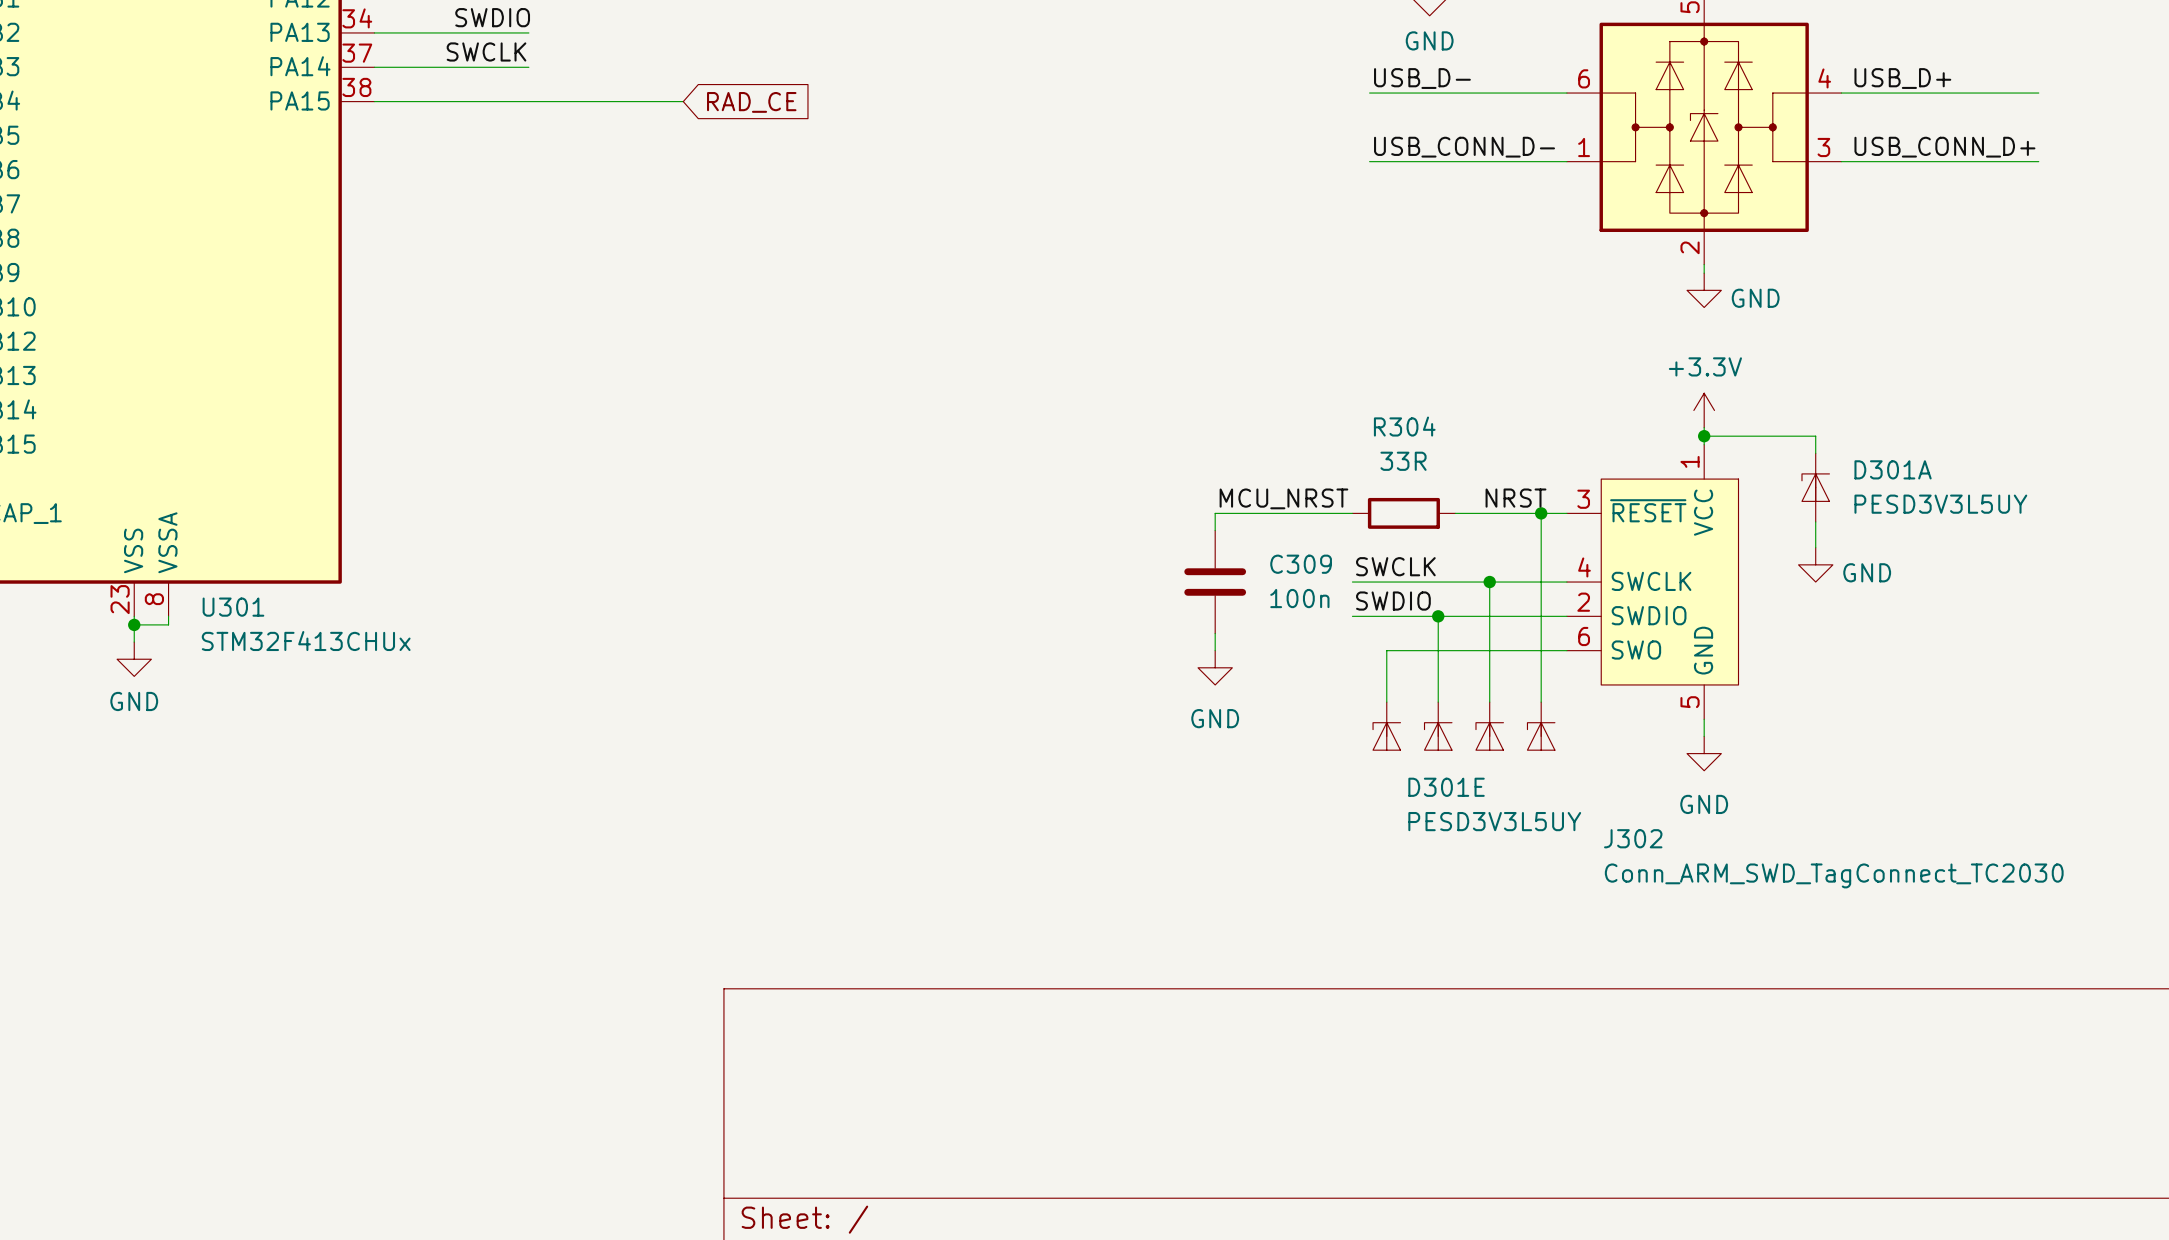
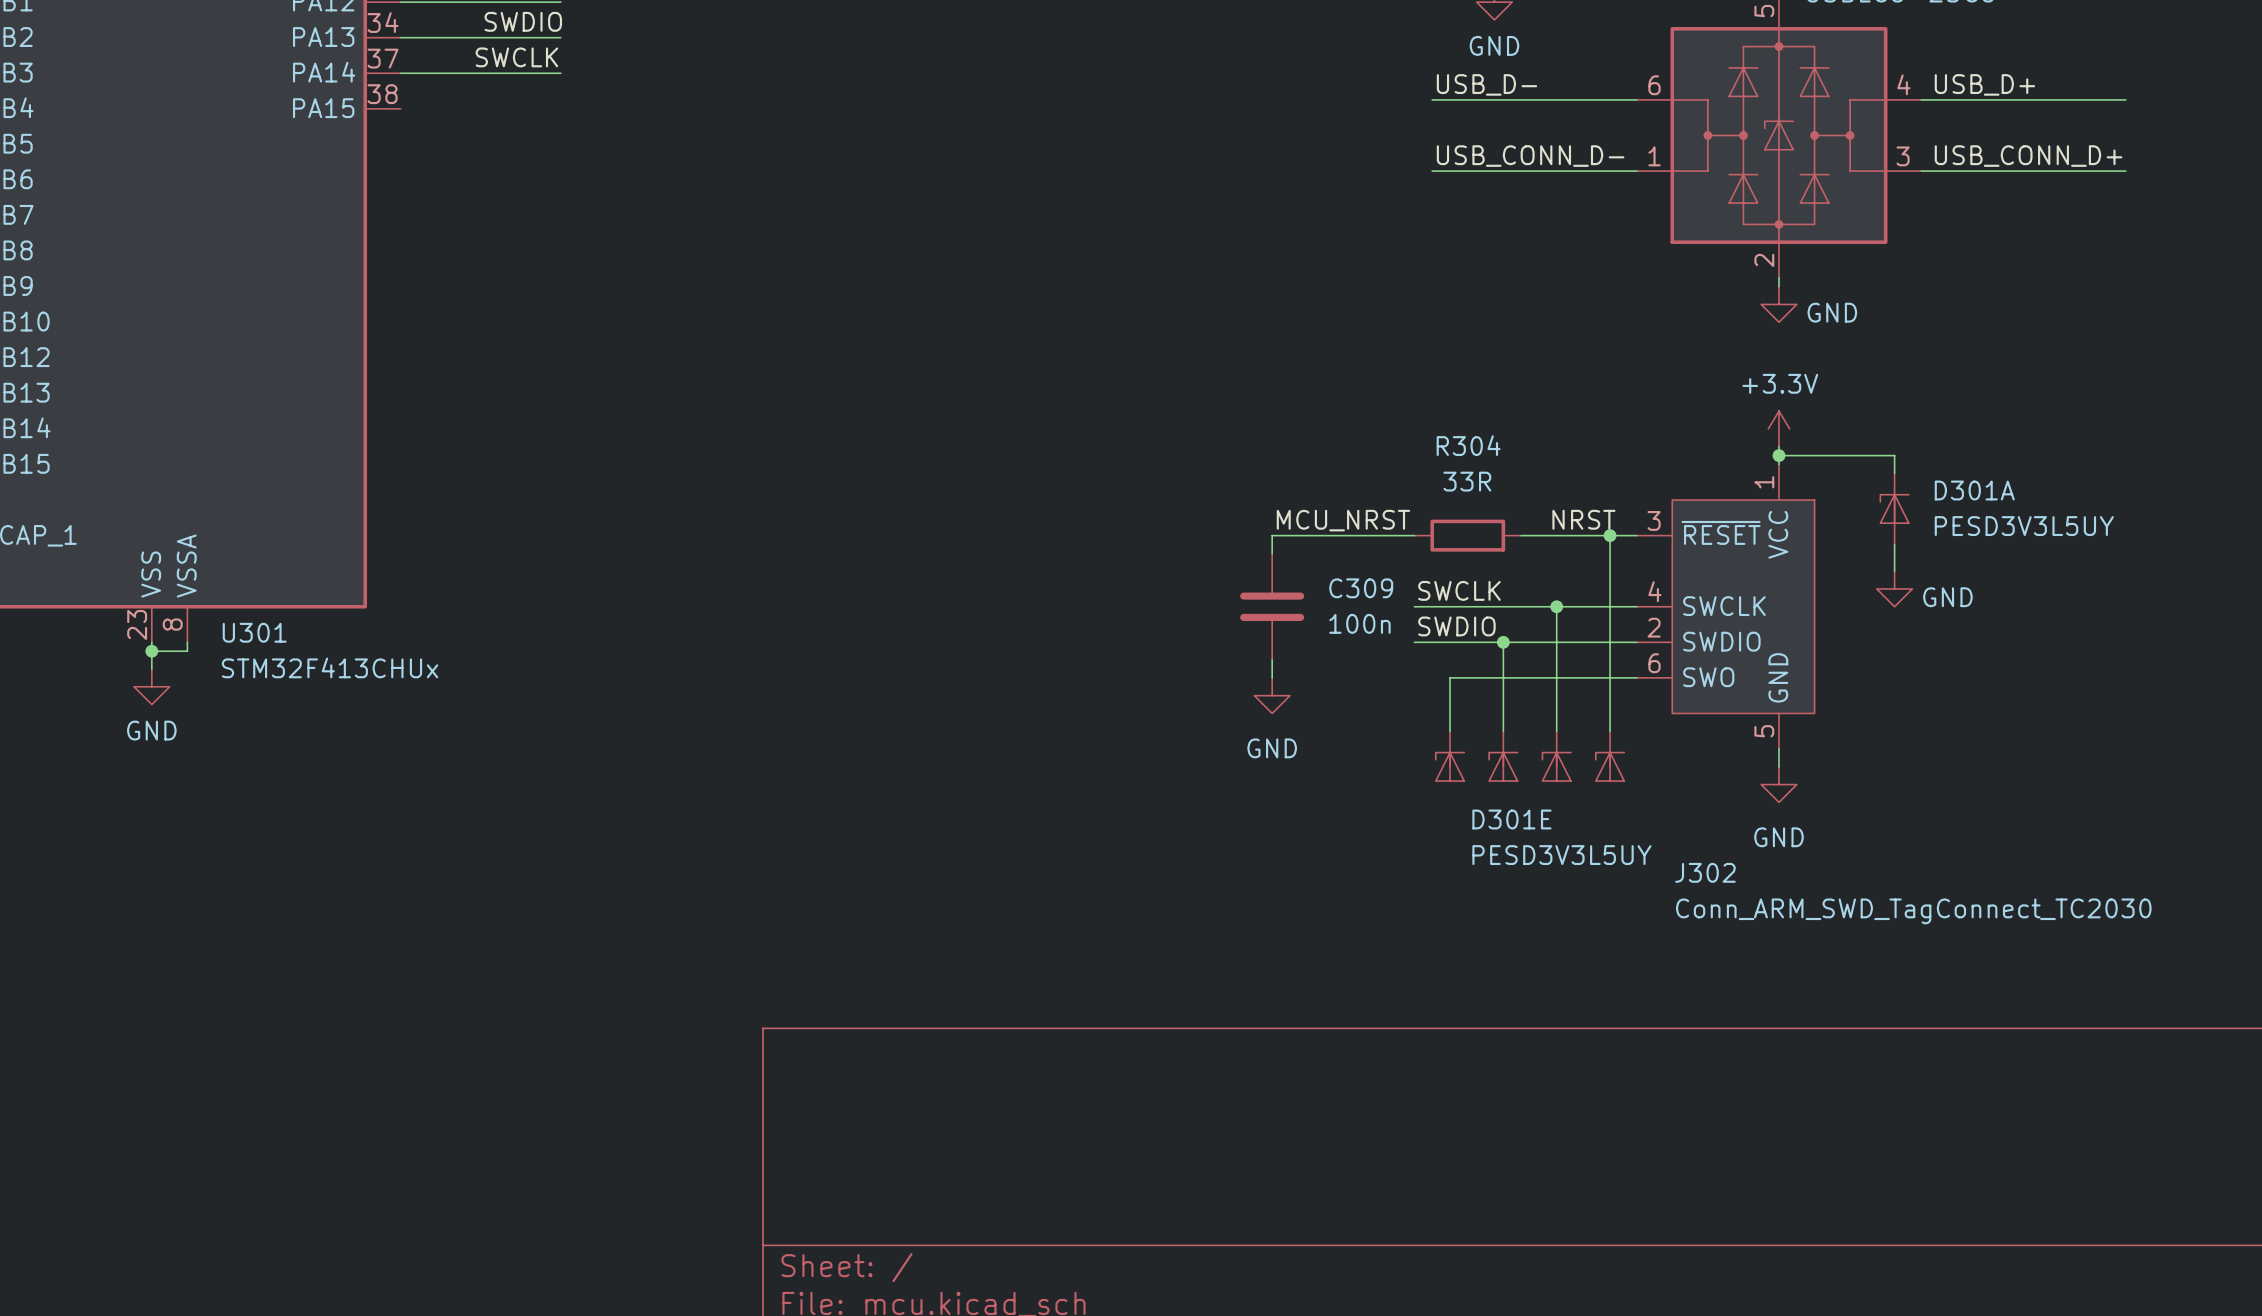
wire: (374, 101) (683, 101) -> none
global label: RAD_CE (751, 102) -> none

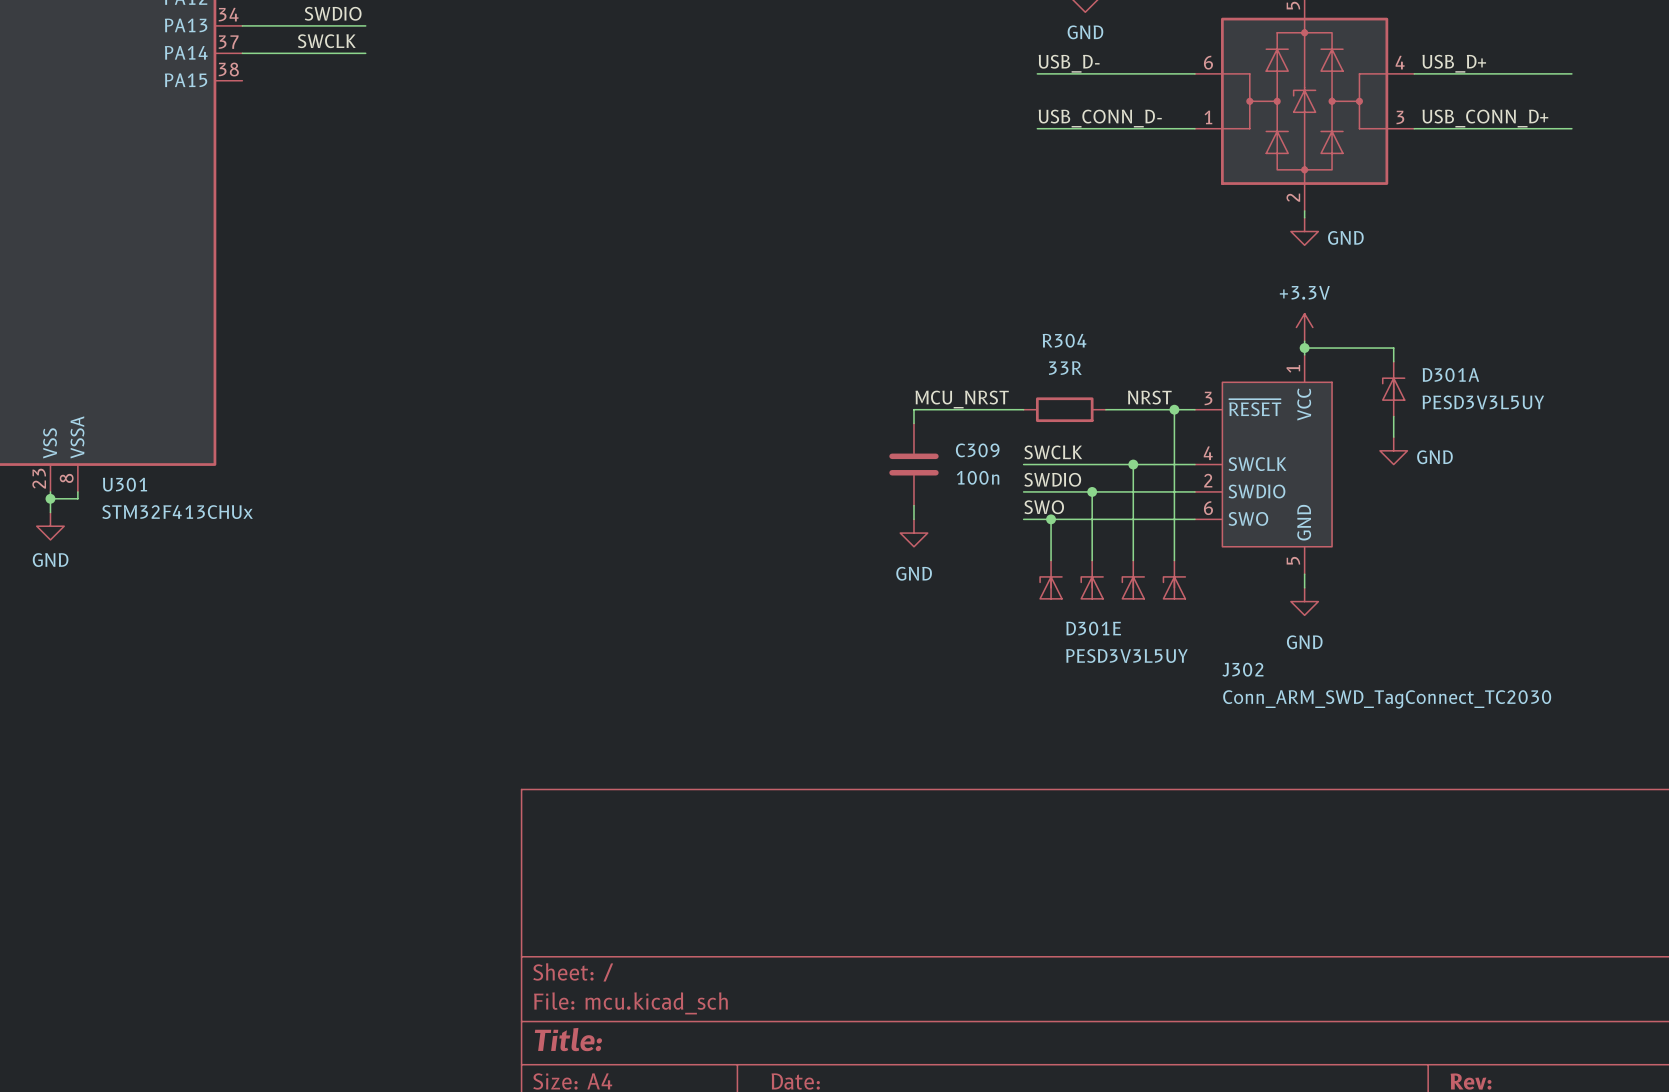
label: none -> SWO (1044, 507)
wire: none -> (1023, 519) (1051, 519)
junction: none -> (1051, 519)

